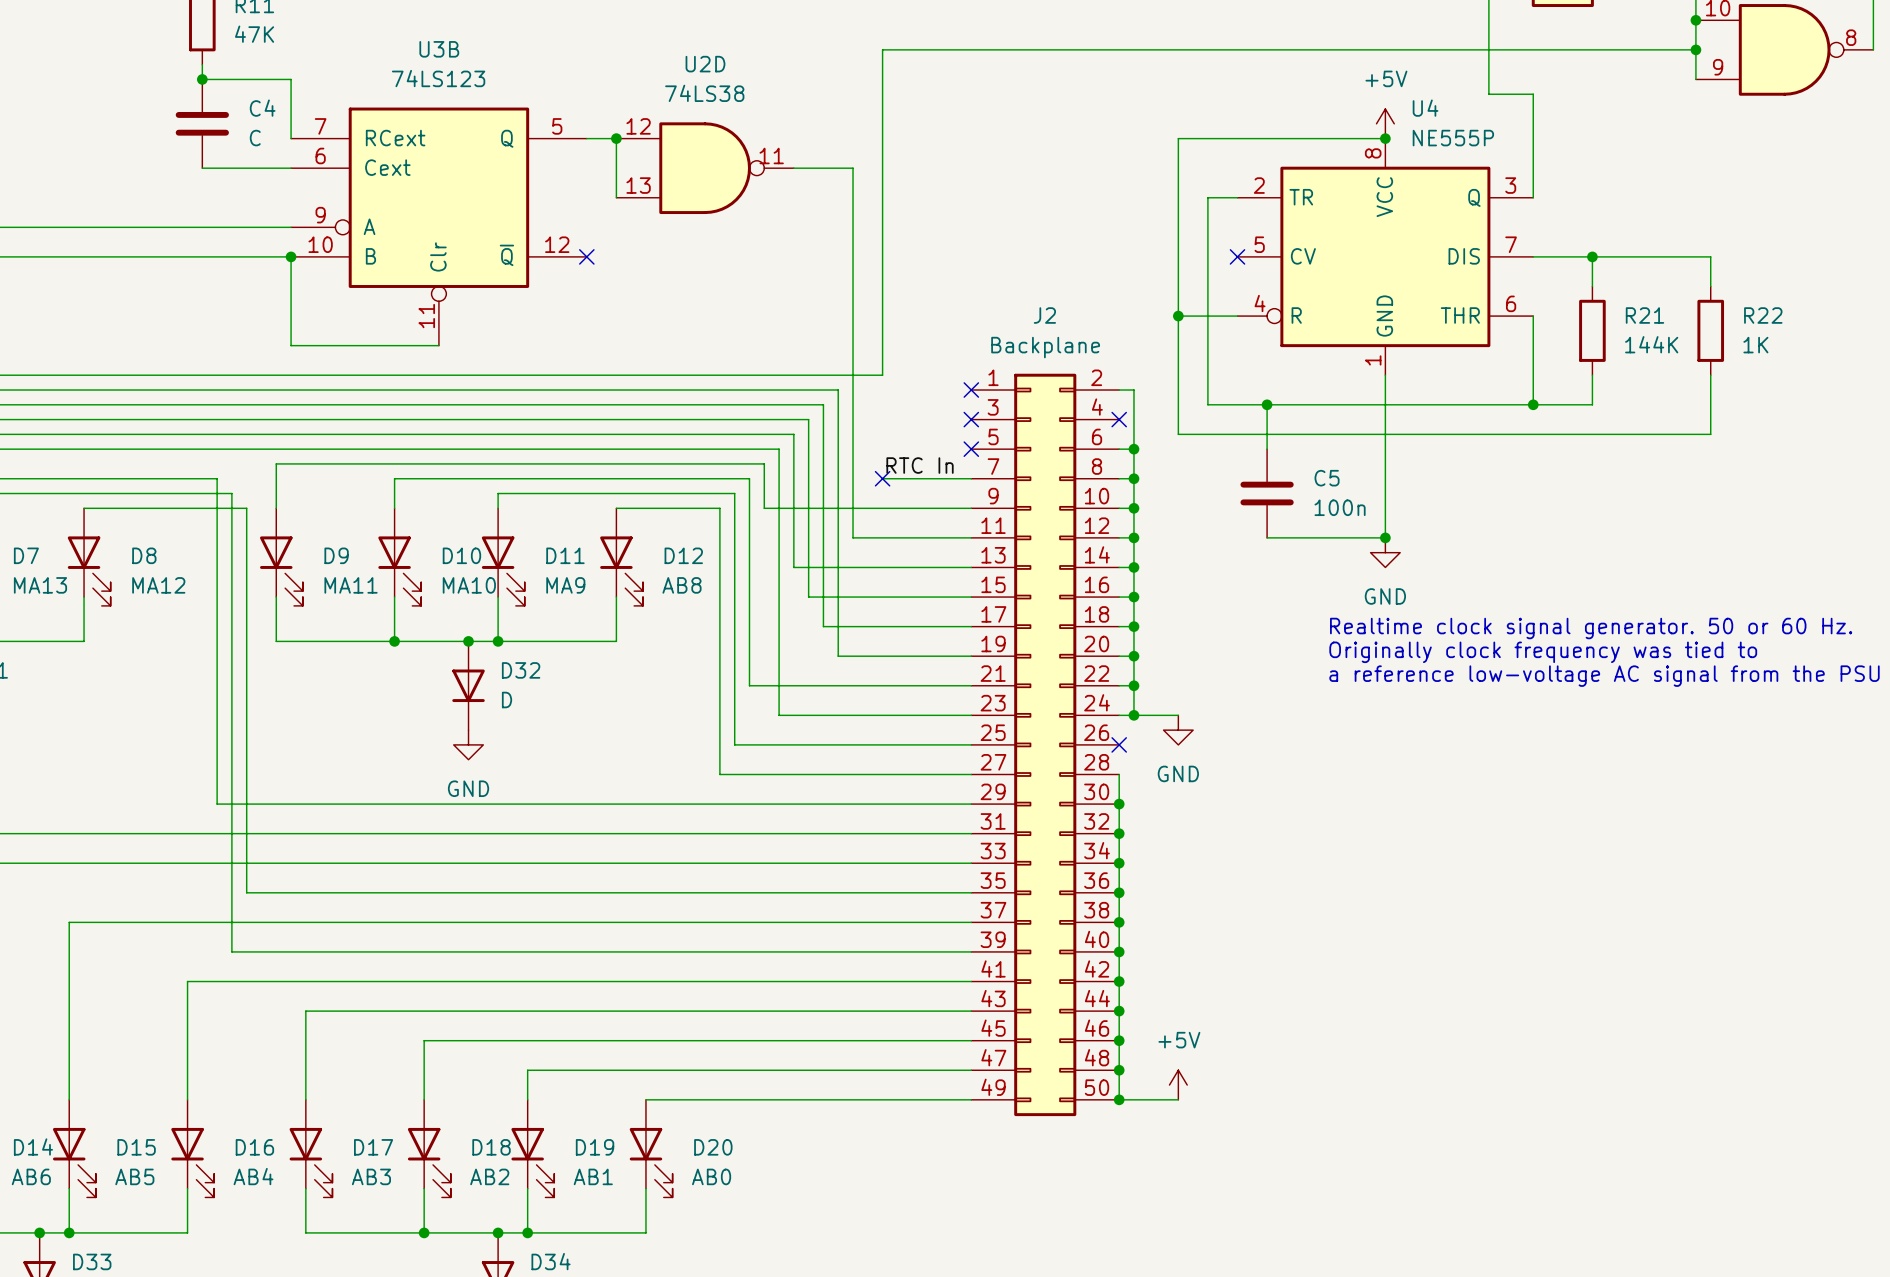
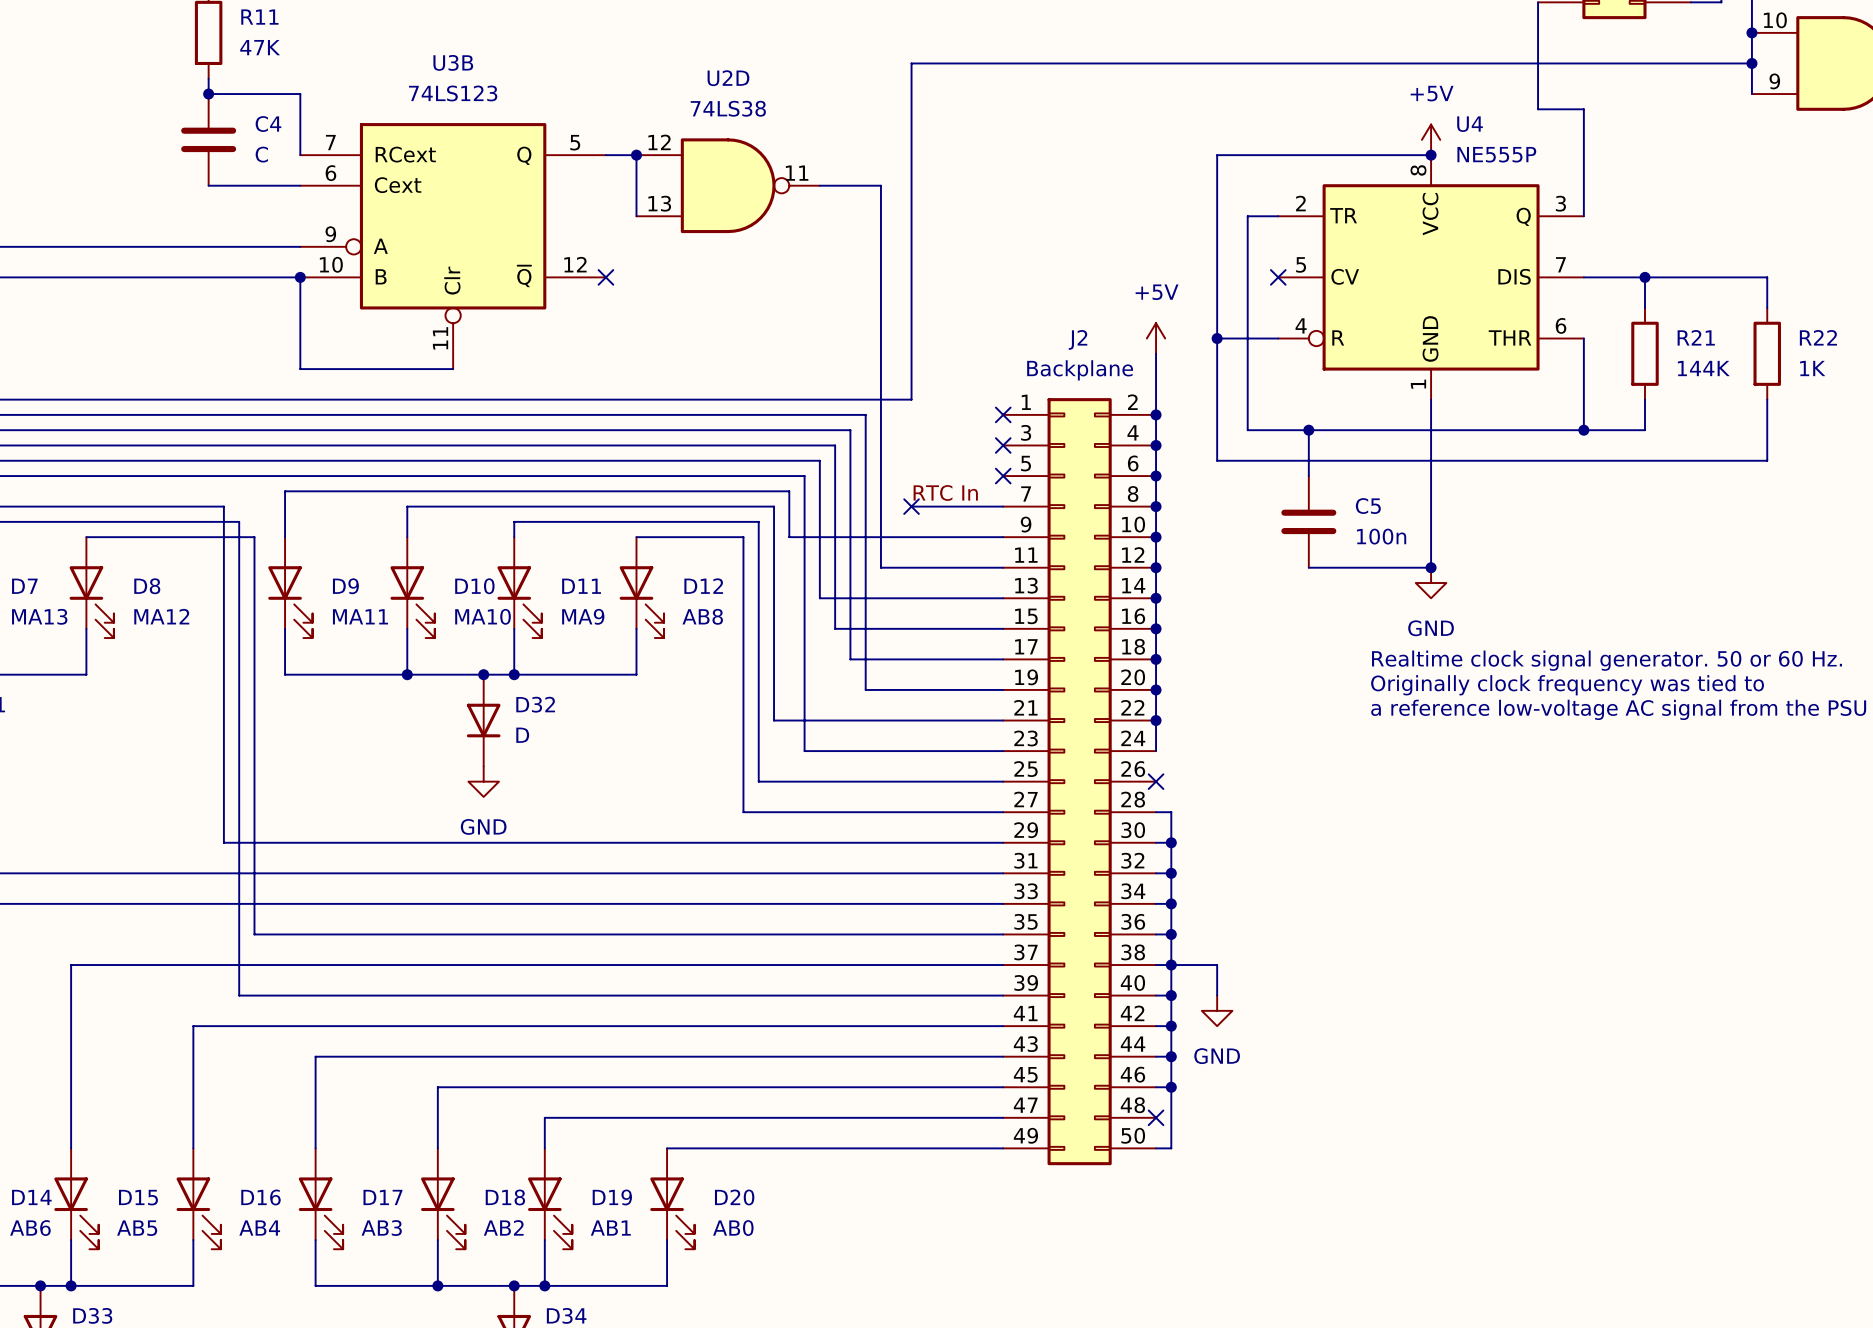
power symbol: none -> +5V (1156, 338)
wire: (1119, 390) (1133, 390) (1133, 715) -> none
junction: none -> (1156, 414)
junction: none -> (1156, 445)
no-connect mark: (1119, 419) -> none
wire: (1119, 449) (1133, 449) -> none
junction position: (1133, 449) -> (1156, 476)
wire: (1119, 478) (1133, 478) -> none
junction position: (1133, 478) -> (1156, 506)
wire: (1119, 508) (1133, 508) -> none
junction position: (1133, 508) -> (1156, 537)
wire: (1119, 537) (1133, 537) -> (1156, 842) (1171, 842)
junction position: (1133, 537) -> (1156, 567)
wire: (1119, 567) (1133, 567) -> (1156, 873) (1171, 873)
junction position: (1133, 567) -> (1156, 598)
wire: (1119, 597) (1133, 597) -> (1156, 903) (1171, 903)
junction position: (1133, 597) -> (1156, 628)
wire: (1119, 626) (1133, 626) -> (1156, 934) (1171, 934)
junction position: (1133, 626) -> (1156, 659)
wire: (1119, 656) (1133, 656) -> none
junction position: (1133, 656) -> (1156, 689)
wire: (1119, 685) (1133, 685) -> (1156, 995) (1171, 995)
junction position: (1133, 685) -> (1156, 720)
wire: (1119, 715) (1178, 715) -> (1156, 751) (1156, 353)
junction: (1133, 715) -> none
power symbol position: GND (1178, 730) -> GND (1217, 1010)
wire: (1119, 774) (1119, 1099) -> (1156, 812) (1171, 812) (1171, 1148)
junction position: (1119, 804) -> (1171, 842)
junction position: (1119, 833) -> (1171, 873)
junction position: (1119, 863) -> (1171, 903)
junction position: (1119, 892) -> (1171, 934)
wire: none -> (1156, 965) (1217, 965) (1217, 995)
junction position: (1119, 922) -> (1171, 965)
junction position: (1119, 951) -> (1171, 995)
wire: none -> (1156, 1026) (1171, 1026)
junction position: (1119, 981) -> (1171, 1026)
wire: none -> (1156, 1056) (1171, 1056)
junction position: (1119, 1011) -> (1171, 1056)
wire: none -> (1156, 1087) (1171, 1087)
junction position: (1119, 1040) -> (1171, 1087)
junction: (1119, 1070) -> none
no-connect mark: none -> (1156, 1117)
power symbol: +5V (1178, 1085) -> none
junction: (1119, 1099) -> none
wire: (1133, 1099) (1178, 1099) -> none

